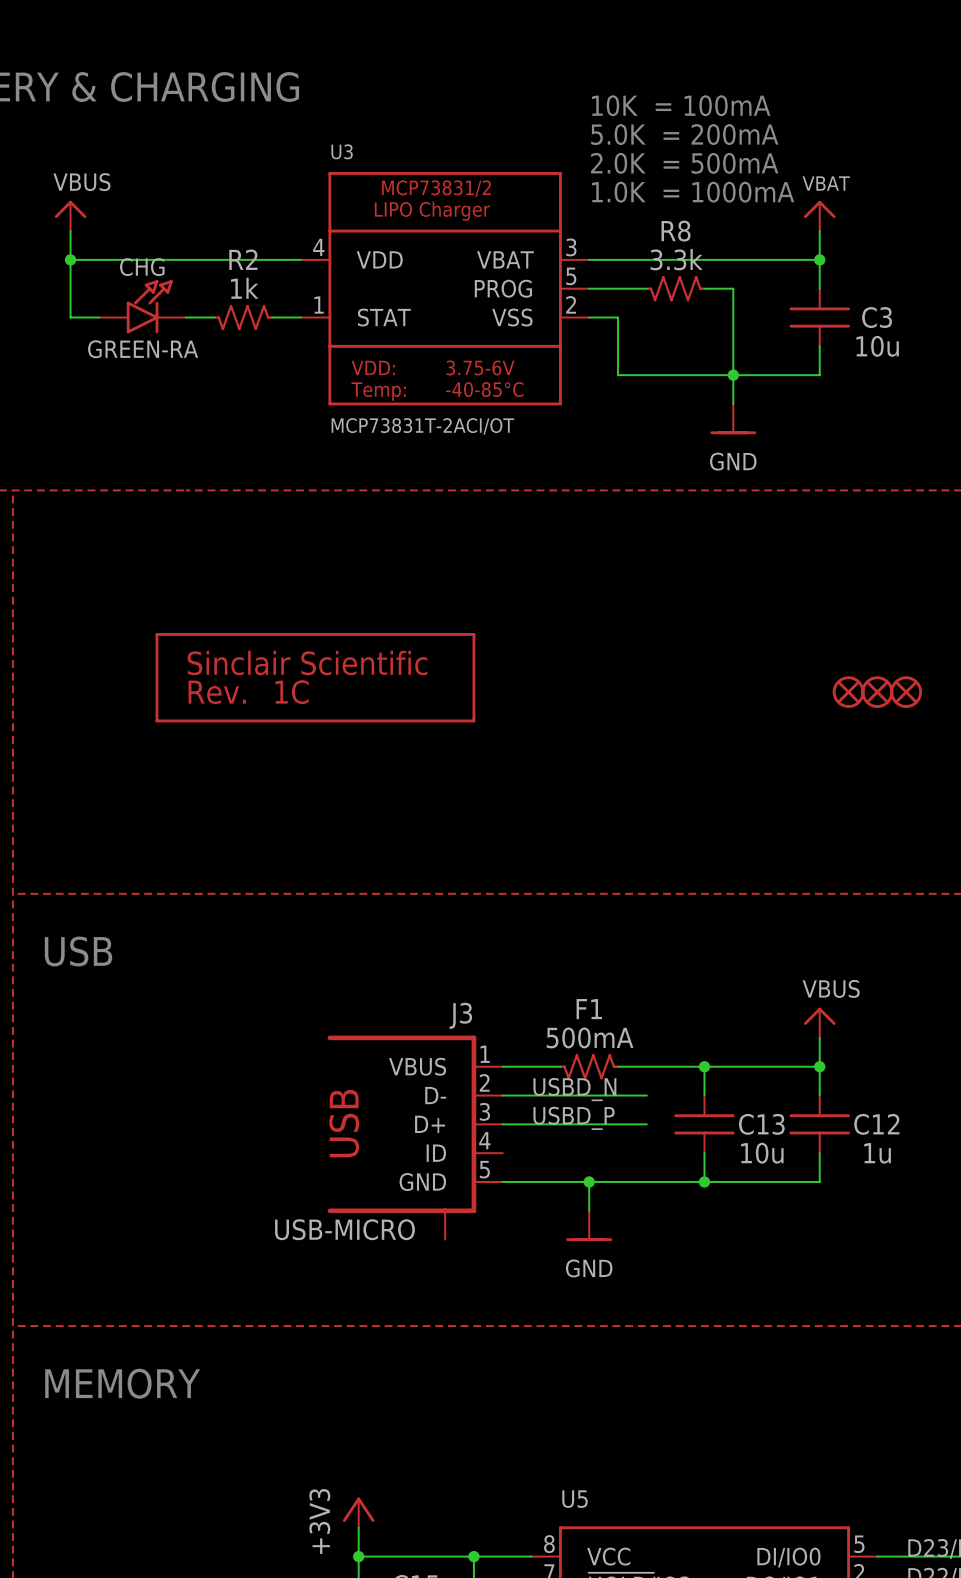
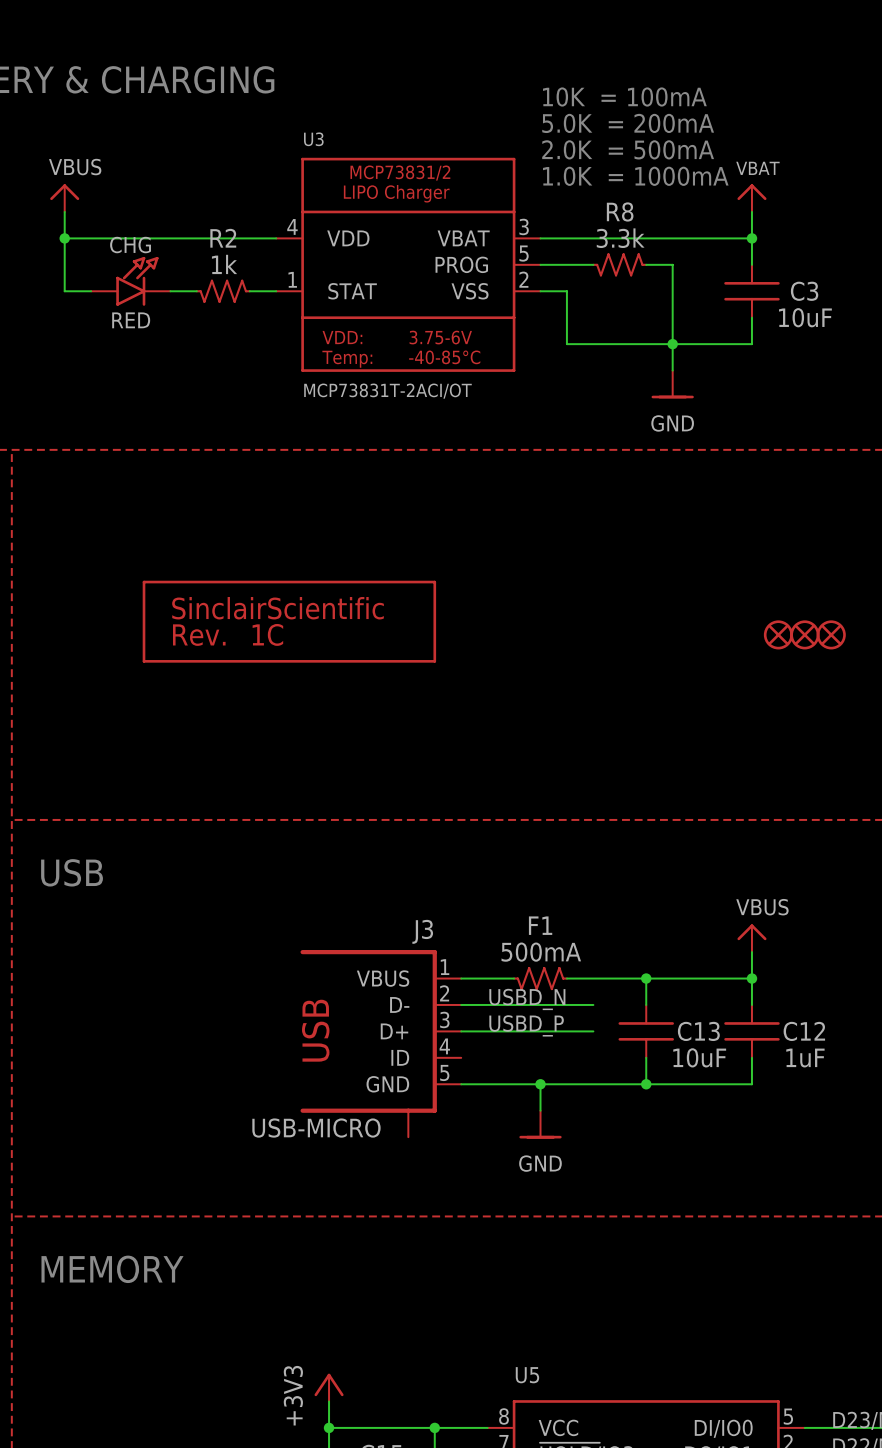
C3 value: 10u (877, 346) -> 10uF (805, 317)
CHG value: GREEN-RA (143, 349) -> RED (131, 320)
part text: Sinclair Scientific (307, 663) -> SinclairScientific (278, 608)
C13 value: 10u (762, 1153) -> 10uF (699, 1057)
C12 value: 1u (877, 1153) -> 1uF (805, 1058)

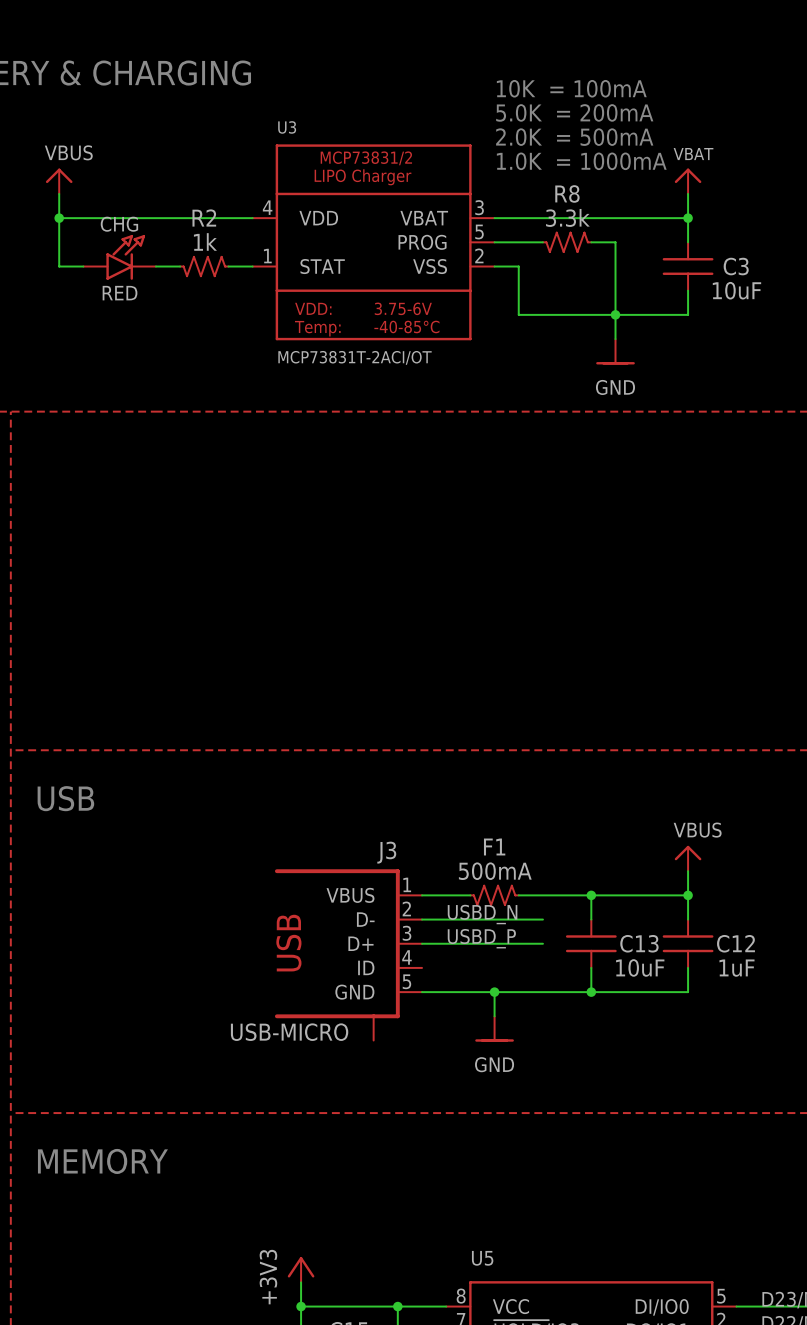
part: (289, 621) -> none
part: (778, 634) -> none
part: (804, 634) -> none
part: (831, 634) -> none

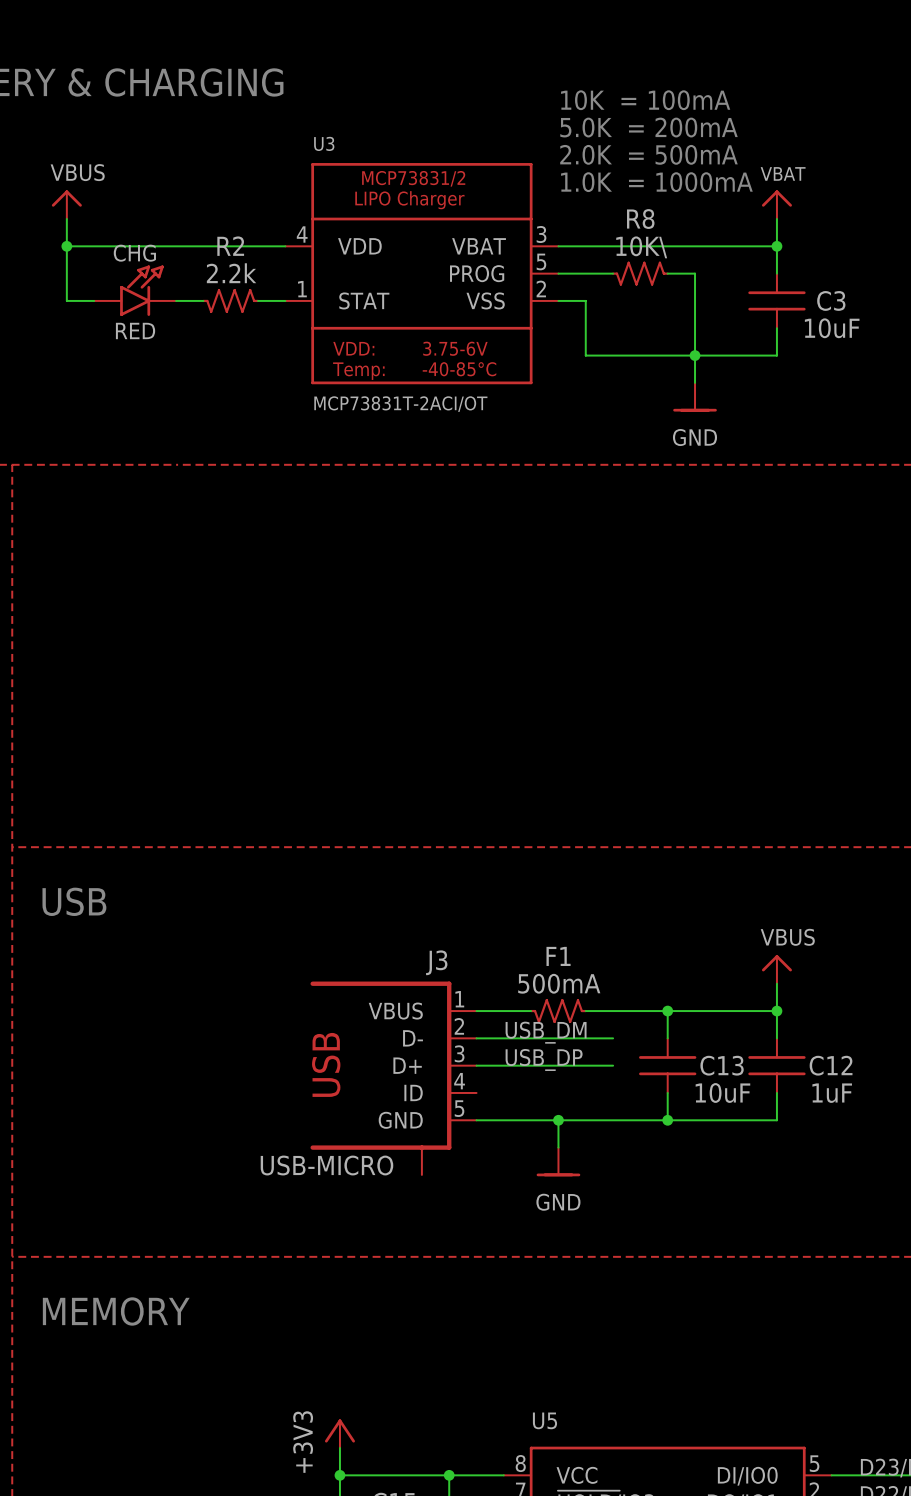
R8 value: 3.3k (567, 217) -> 10K\ (641, 247)
R2 value: 1k (205, 241) -> 2.2k (231, 273)
label: USBD_N (482, 914) -> USB_DM (546, 1032)
label: USBD_P (481, 938) -> USB_DP (544, 1059)

